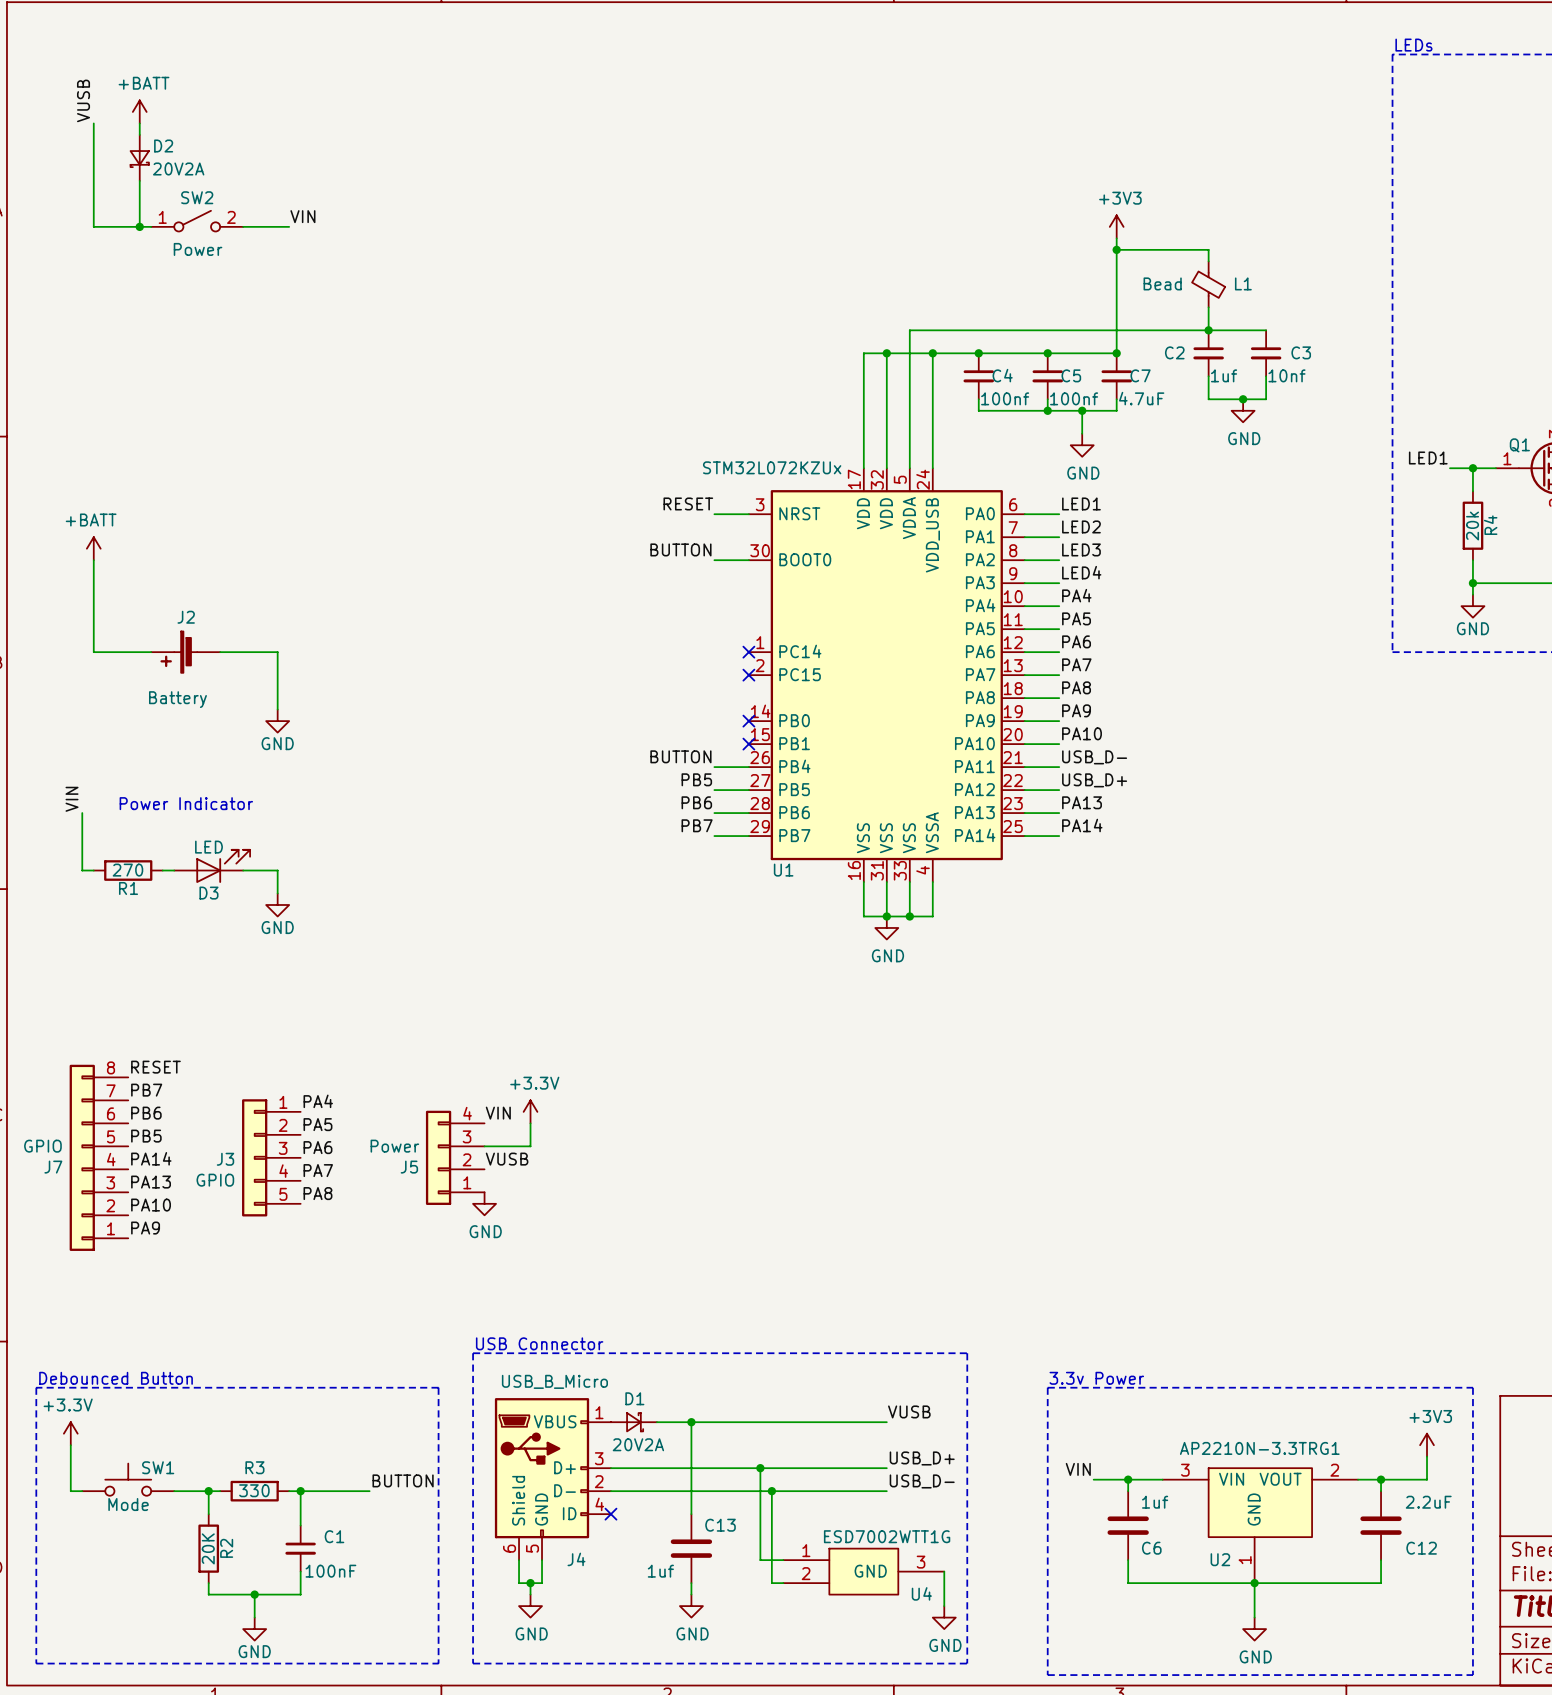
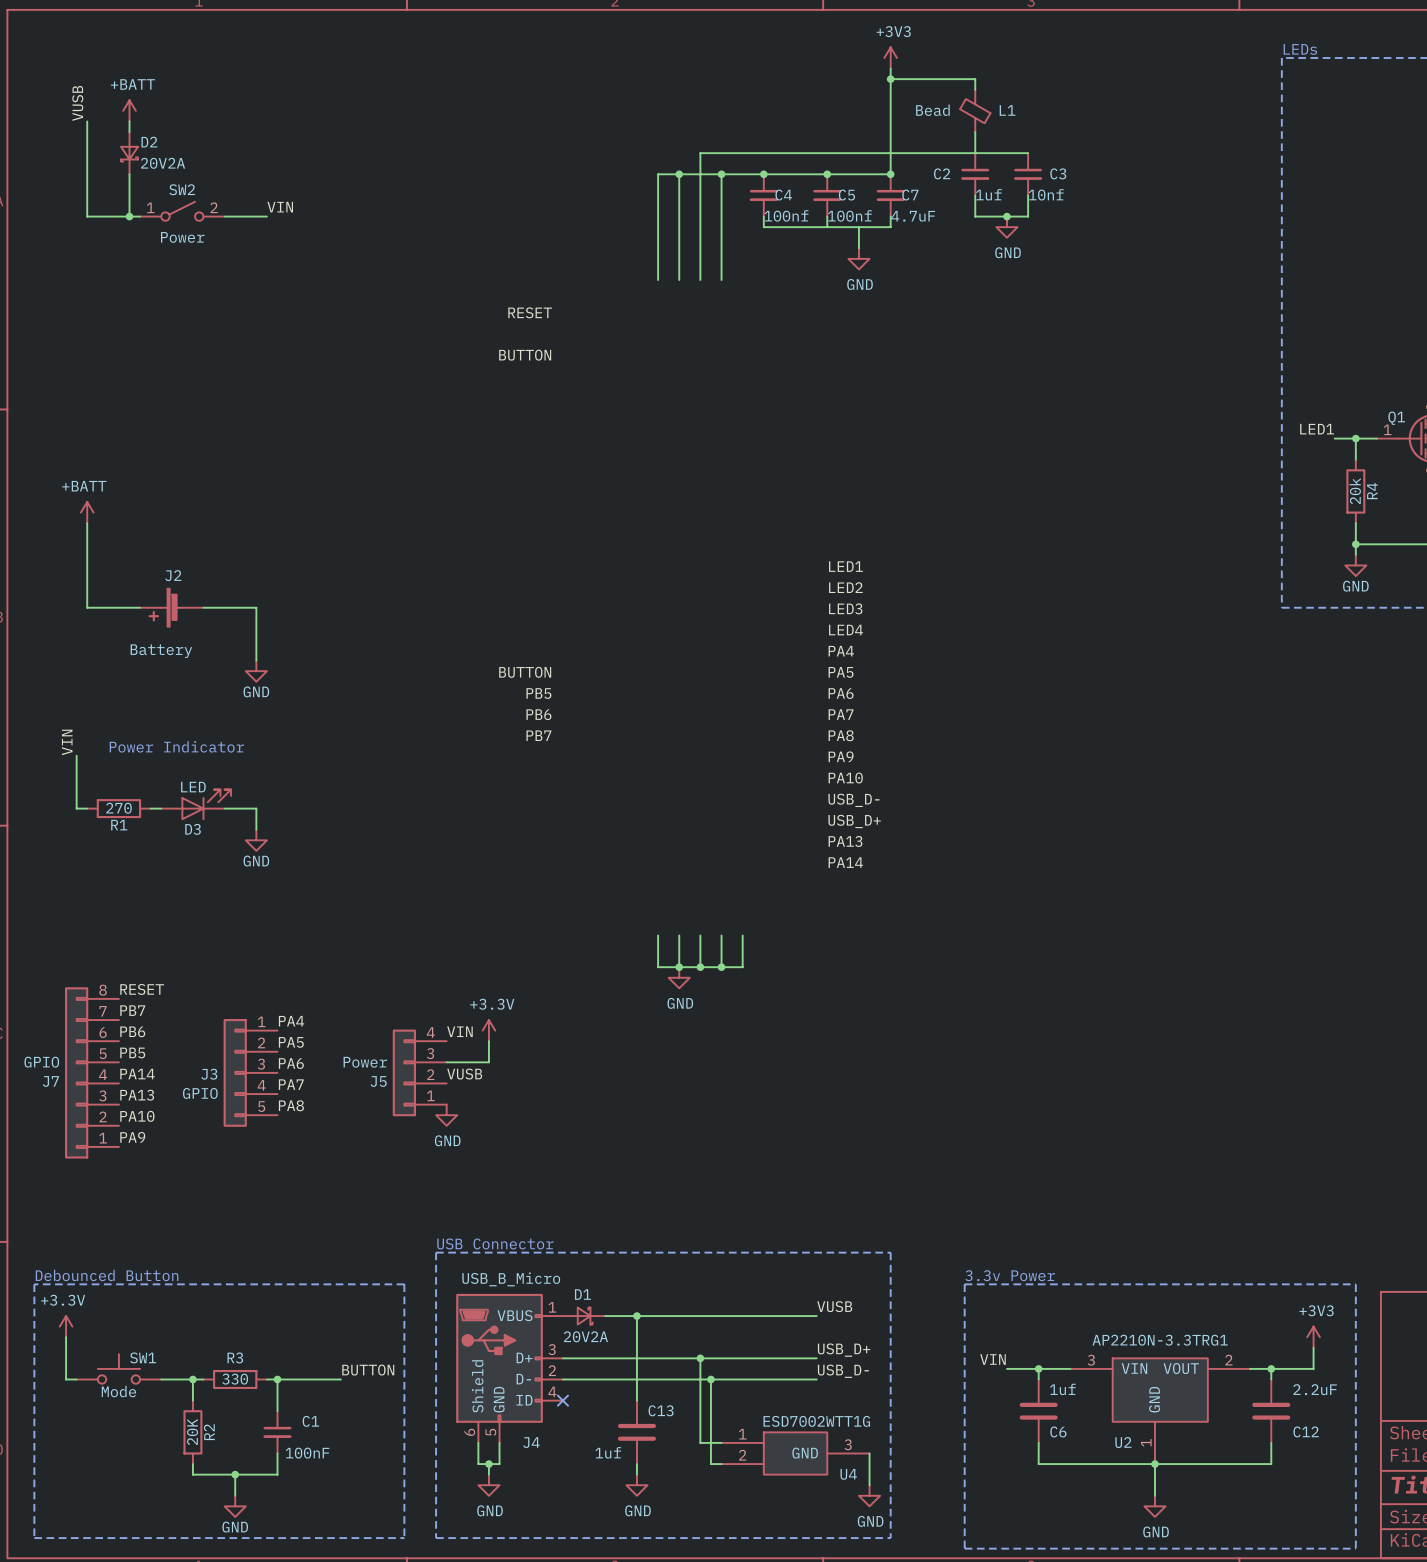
power symbol: none -> +3V3 (890, 58)
wire: none -> (890, 68) (890, 174) (658, 174) (658, 280)
wire: none -> (890, 79) (975, 79) (975, 89)
junction: none -> (890, 79)
wire: none -> (975, 132) (975, 153)
wire: none -> (1028, 153) (700, 153) (700, 280)
wire: none -> (679, 174) (679, 280)
junction: none -> (679, 174)
junction: none -> (721, 174)
junction: none -> (763, 174)
junction: none -> (827, 174)
junction: none -> (890, 174)
wire: none -> (975, 195) (975, 216) (1028, 216) (1028, 195)
wire: none -> (763, 216) (763, 227) (890, 227) (890, 216)
wire: none -> (827, 216) (827, 227)
power symbol: +3V3 (1116, 226) -> none
wire: none -> (858, 227) (858, 248)
power symbol: none -> GND (1006, 227)
wire: (1116, 238) (1116, 353) (863, 353) (863, 468) -> none
wire: (1116, 249) (1208, 249) (1208, 261) -> none
junction position: (1116, 249) -> (1006, 216)
power symbol: none -> GND (858, 258)
L1 position: (1208, 284) -> (975, 110)
wire: (1208, 307) (1208, 330) -> none
junction: (1208, 330) -> none
wire: (1266, 330) (909, 330) (909, 468) -> none
wire: (886, 353) (886, 468) -> (721, 174) (721, 280)
junction: (886, 353) -> none
wire: (932, 353) (932, 468) -> none
junction: (932, 353) -> none
junction: (978, 353) -> none
junction: (1047, 353) -> none
junction: (1116, 353) -> none
C2 position: (1208, 353) -> (975, 174)
C3 position: (1266, 353) -> (1028, 174)
C4 position: (978, 376) -> (763, 195)
C5 position: (1047, 376) -> (827, 195)
C7 position: (1116, 376) -> (890, 195)
wire: (1208, 376) (1208, 399) (1266, 399) (1266, 376) -> none
label: none -> BUTTON (525, 355)
wire: (978, 399) (978, 410) (1116, 410) (1116, 399) -> none
wire: (1047, 399) (1047, 410) -> none
junction: (1243, 399) -> none
junction: (1047, 410) -> none
wire: (1082, 410) (1082, 433) -> none
junction: (1082, 410) -> none
power symbol: GND (1243, 410) -> none
power symbol: GND (1082, 445) -> none
label position: RESET (688, 503) -> RESET (530, 312)
label position: LED1 (1081, 503) -> LED1 (845, 566)
wire: (714, 514) (748, 514) -> none
wire: (1024, 514) (1059, 514) -> none
label position: LED2 (1081, 526) -> LED2 (845, 587)
wire: (1024, 537) (1059, 537) -> none
label: BUTTON (680, 549) -> none
label position: LED3 (1081, 549) -> LED3 (845, 608)
wire: (714, 560) (748, 560) -> none
wire: (1024, 560) (1059, 560) -> none
label position: LED4 (1081, 572) -> LED4 (846, 630)
wire: (1024, 583) (1059, 583) -> none
label position: PA4 (1076, 595) -> PA4 (841, 651)
wire: (1024, 606) (1059, 606) -> none
label position: PA5 (1076, 618) -> PA5 (841, 672)
wire: (1024, 629) (1059, 629) -> none
label position: PA6 (1076, 641) -> PA6 (841, 693)
no-connect mark: (748, 652) -> none
wire: (1024, 652) (1059, 652) -> none
label position: PA7 (1076, 664) -> PA7 (841, 714)
no-connect mark: (748, 675) -> none
U1: STM32L072KZUx (886, 675) -> none
wire: (1024, 675) (1059, 675) -> none
label position: PA8 (1076, 687) -> PA8 (841, 735)
wire: (1024, 698) (1059, 698) -> none
label position: PA9 (1076, 710) -> PA9 (841, 756)
no-connect mark: (748, 721) -> none
wire: (1024, 721) (1059, 721) -> none
label: none -> BUTTON (525, 672)
label position: PA10 (1082, 733) -> PA10 (845, 778)
no-connect mark: (748, 744) -> none
wire: (1024, 744) (1059, 744) -> none
label: BUTTON (680, 756) -> none
label position: USB_D- (1094, 757) -> USB_D- (853, 800)
wire: (714, 767) (748, 767) -> none
wire: (1024, 767) (1059, 767) -> none
label position: PB5 (696, 779) -> PB5 (538, 693)
label position: USB_D+ (1094, 780) -> USB_D+ (854, 821)
wire: (714, 790) (748, 790) -> none
wire: (1024, 790) (1059, 790) -> none
label position: PB6 (696, 802) -> PB6 (538, 714)
label position: PA13 (1082, 802) -> PA13 (845, 841)
wire: (714, 813) (748, 813) -> none
wire: (1024, 813) (1059, 813) -> none
label position: PB7 (697, 825) -> PB7 (538, 735)
label position: PA14 (1082, 825) -> PA14 (845, 862)
wire: (714, 836) (748, 836) -> none
wire: (1024, 836) (1059, 836) -> none
wire: (863, 882) (863, 916) (932, 916) (932, 882) -> none
wire: (886, 882) (886, 916) -> (700, 935) (700, 967)
wire: (909, 882) (909, 916) -> (721, 935) (721, 967)
junction: (886, 916) -> none
junction: (909, 916) -> none
power symbol position: GND (886, 927) -> GND (679, 977)
wire: none -> (658, 935) (658, 967) (742, 967) (742, 935)
wire: none -> (679, 935) (679, 967)
junction: none -> (679, 967)
junction: none -> (700, 967)
junction: none -> (721, 967)

